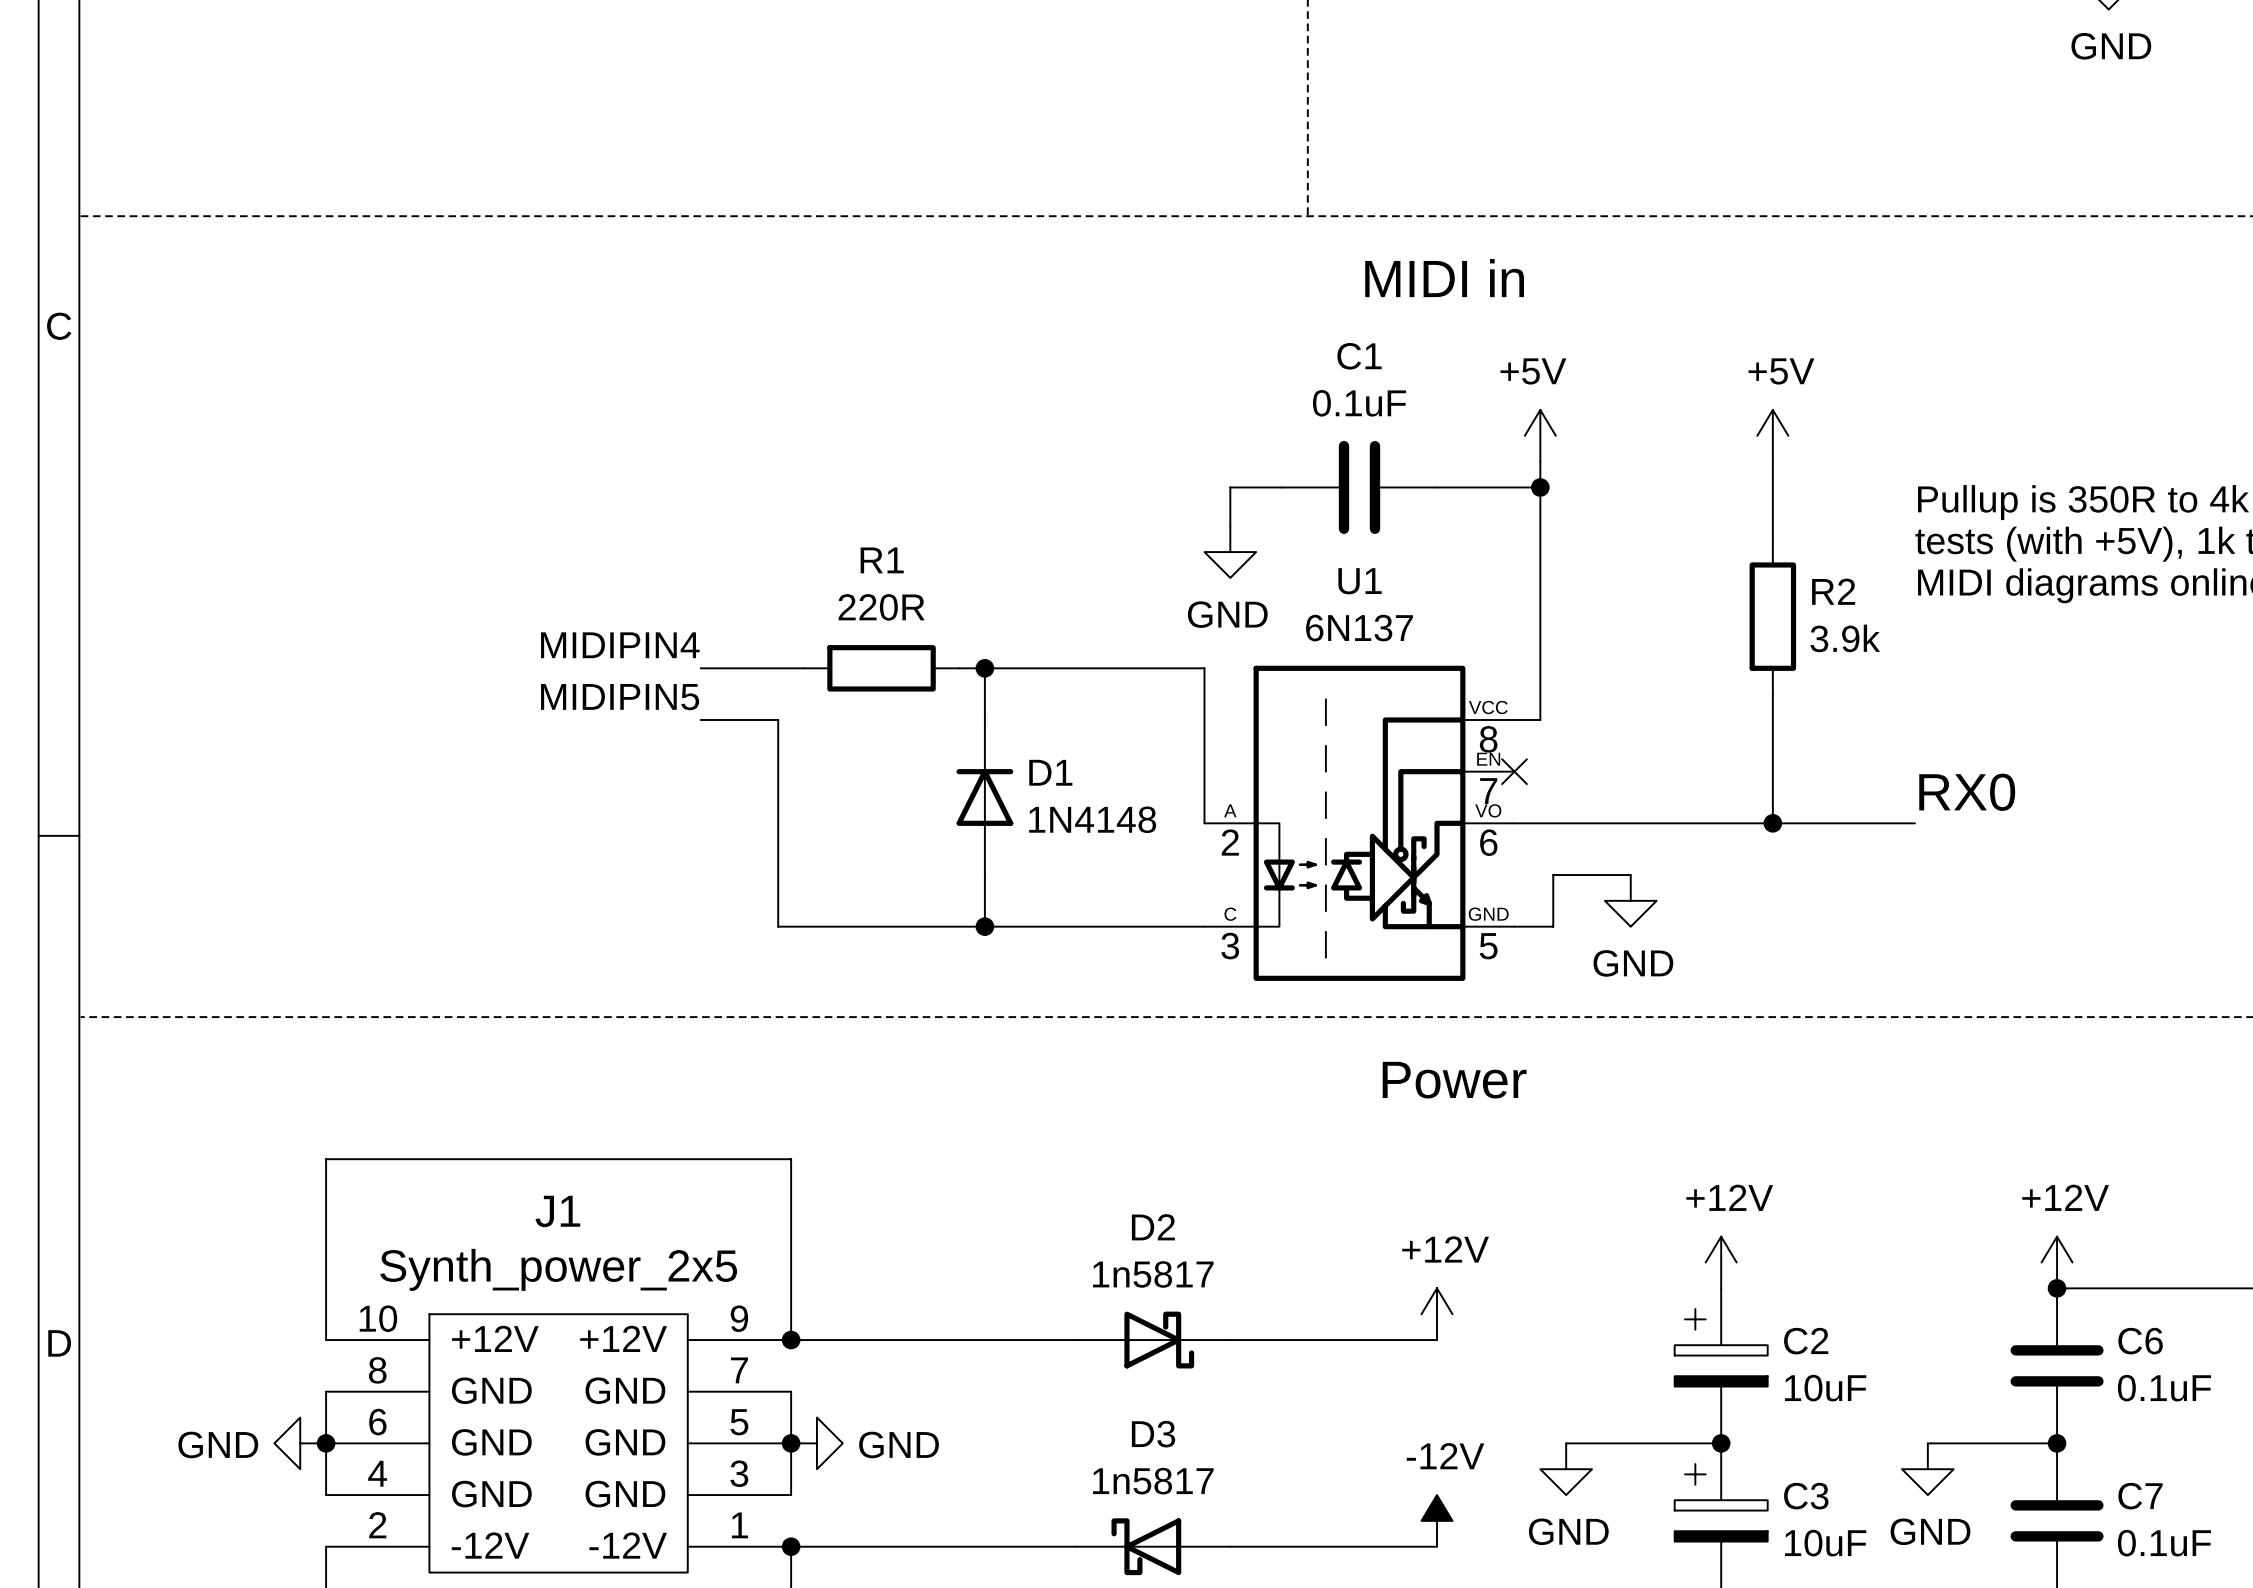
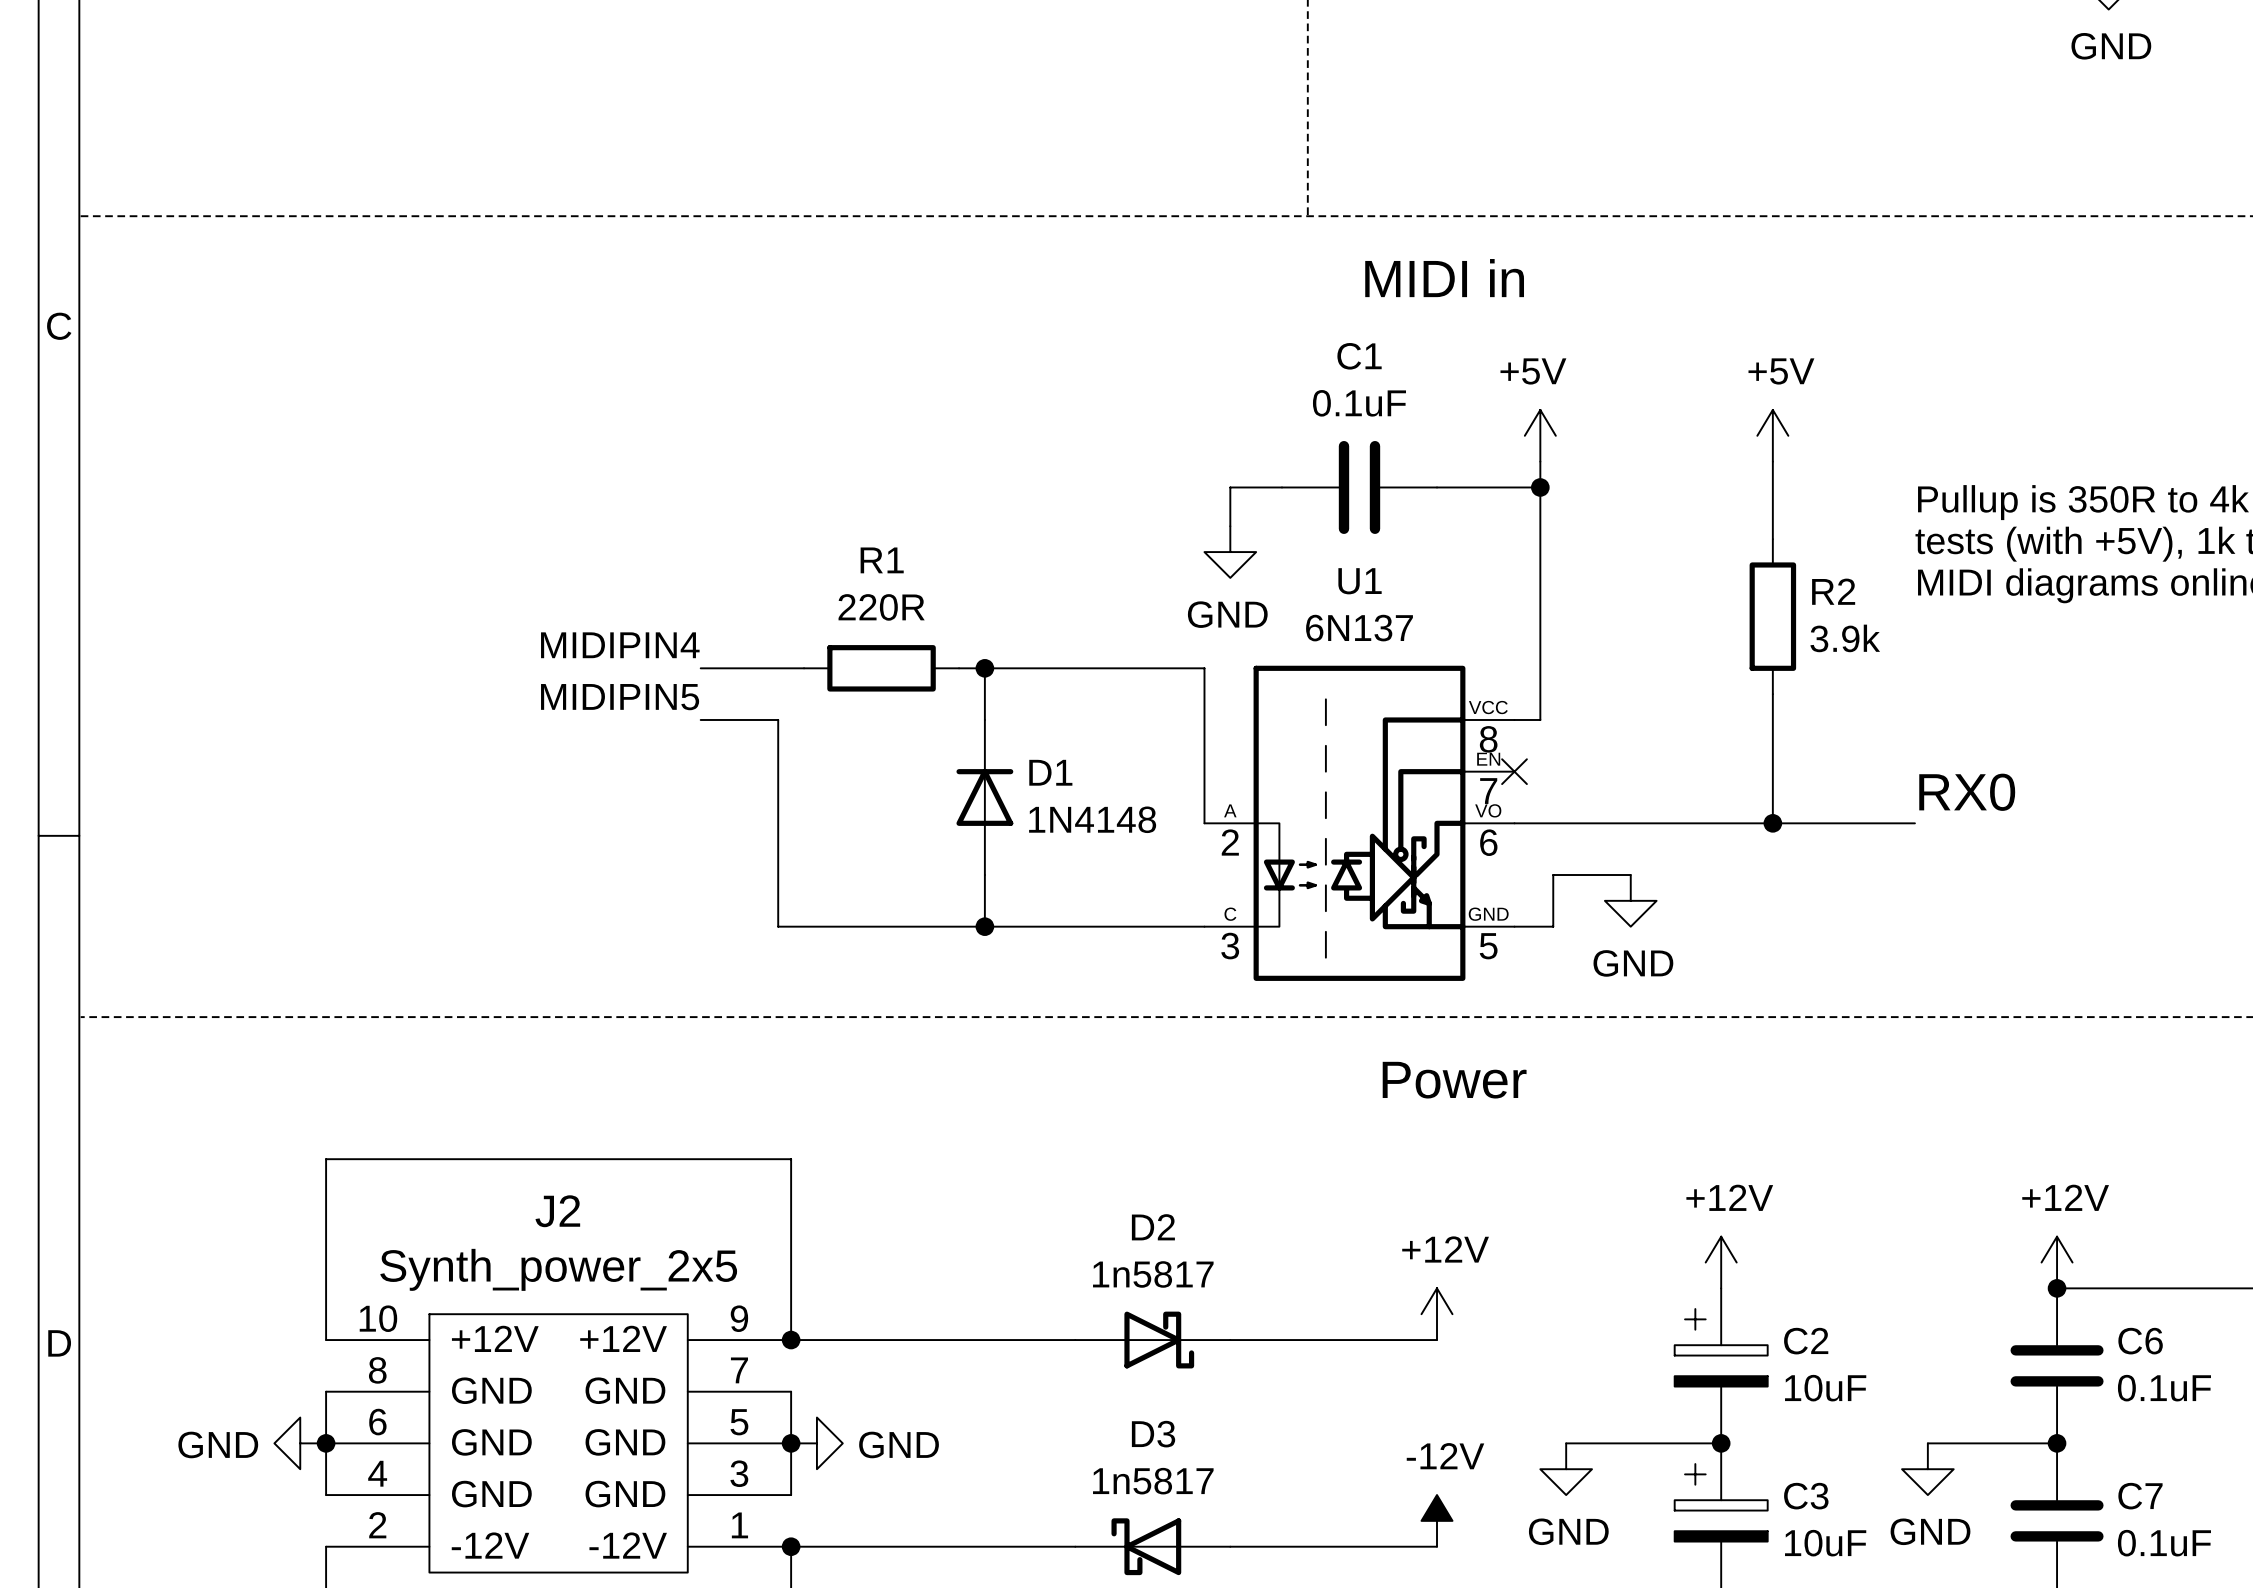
J1 name: J1 (557, 1211) -> J2 (557, 1211)

